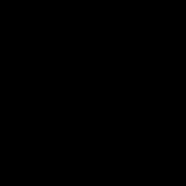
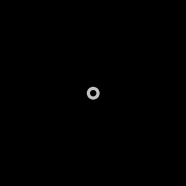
via: none -> (93, 93)

